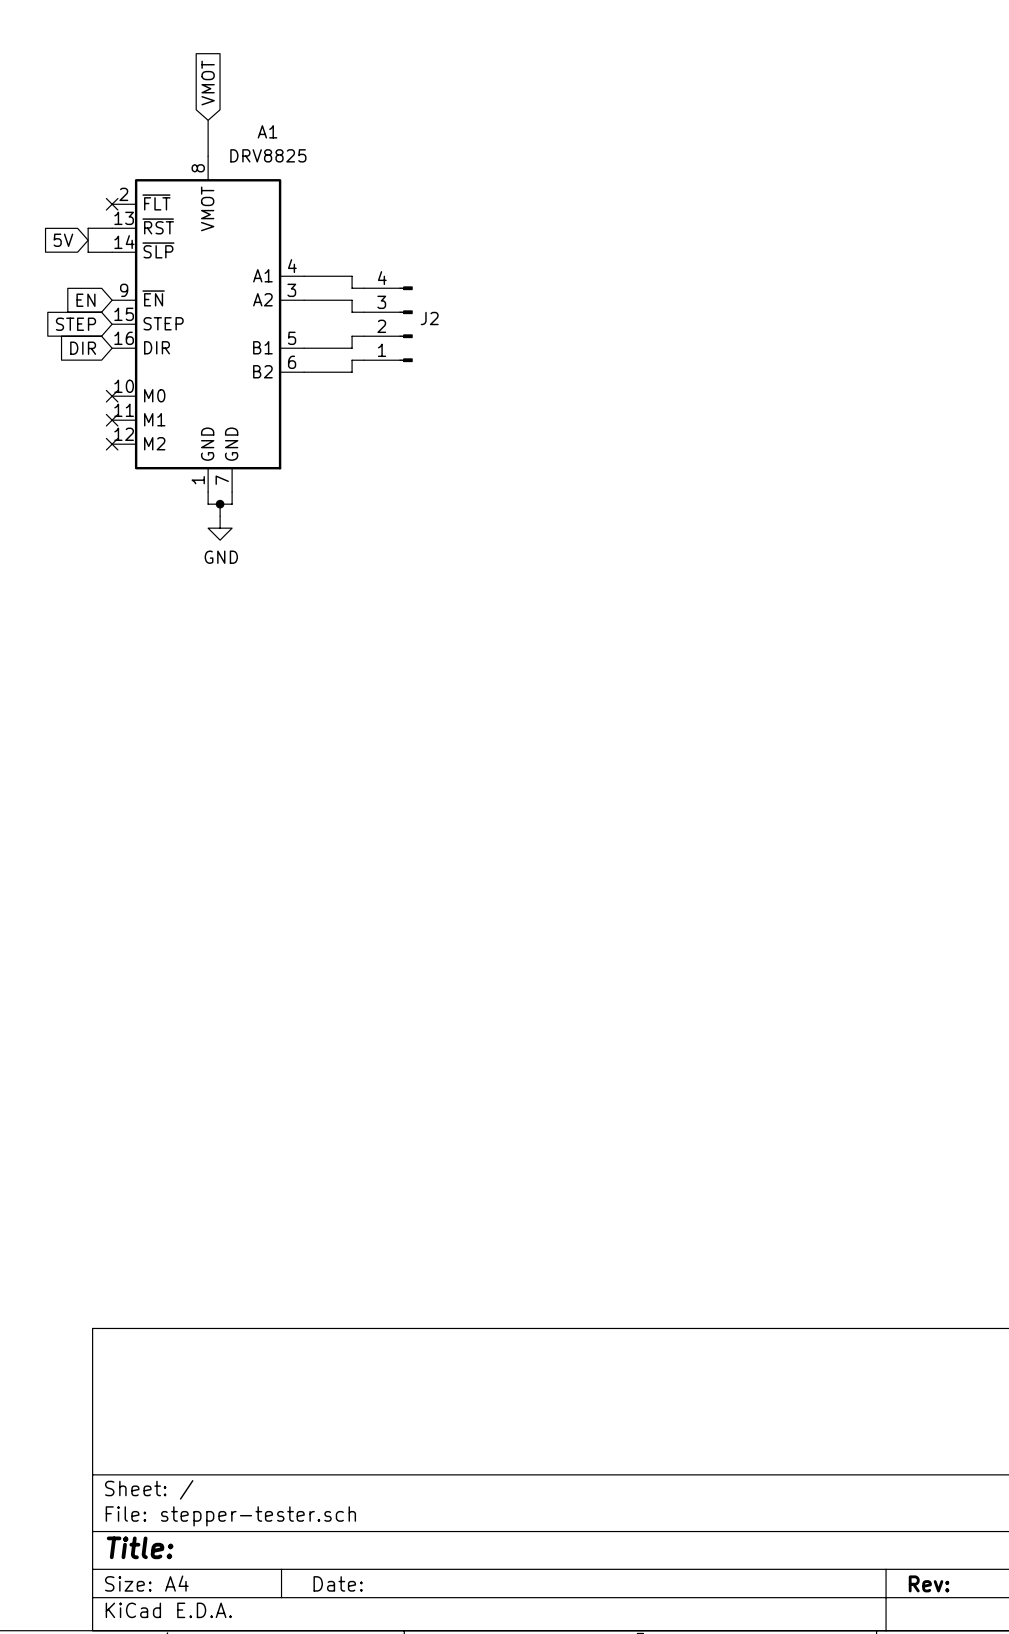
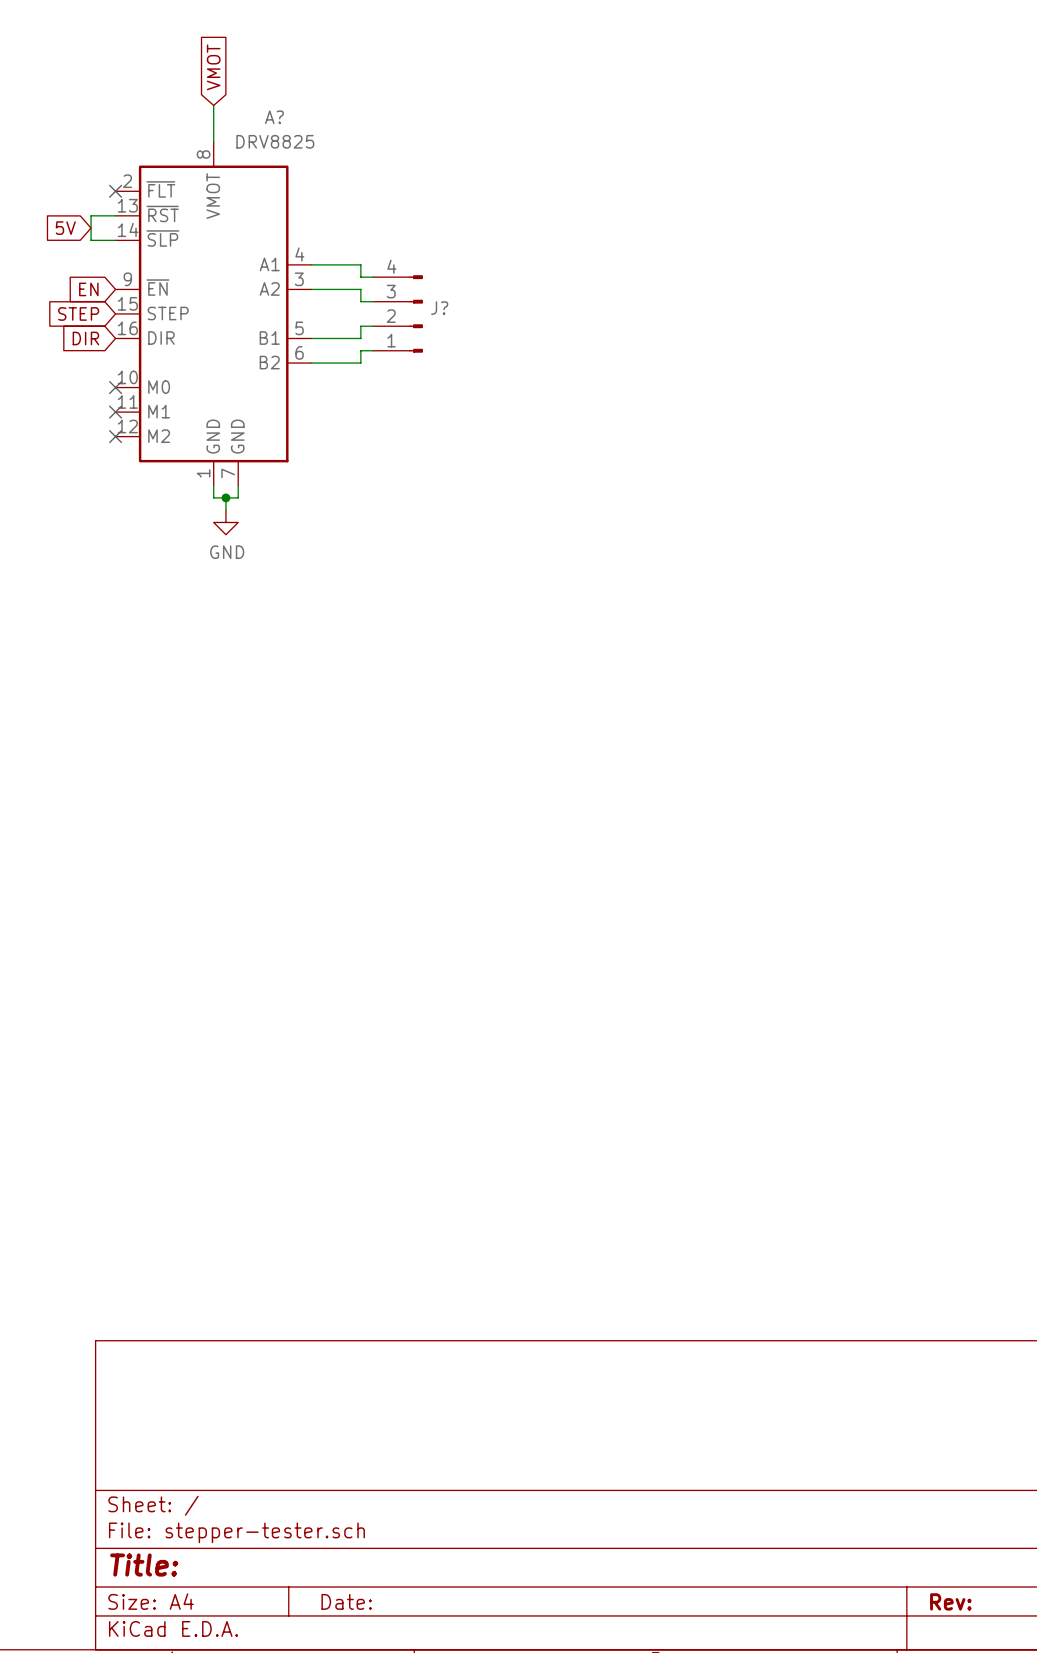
A1 name: A1 (267, 131) -> A? (274, 117)
J2 name: J2 (429, 318) -> J? (439, 308)

